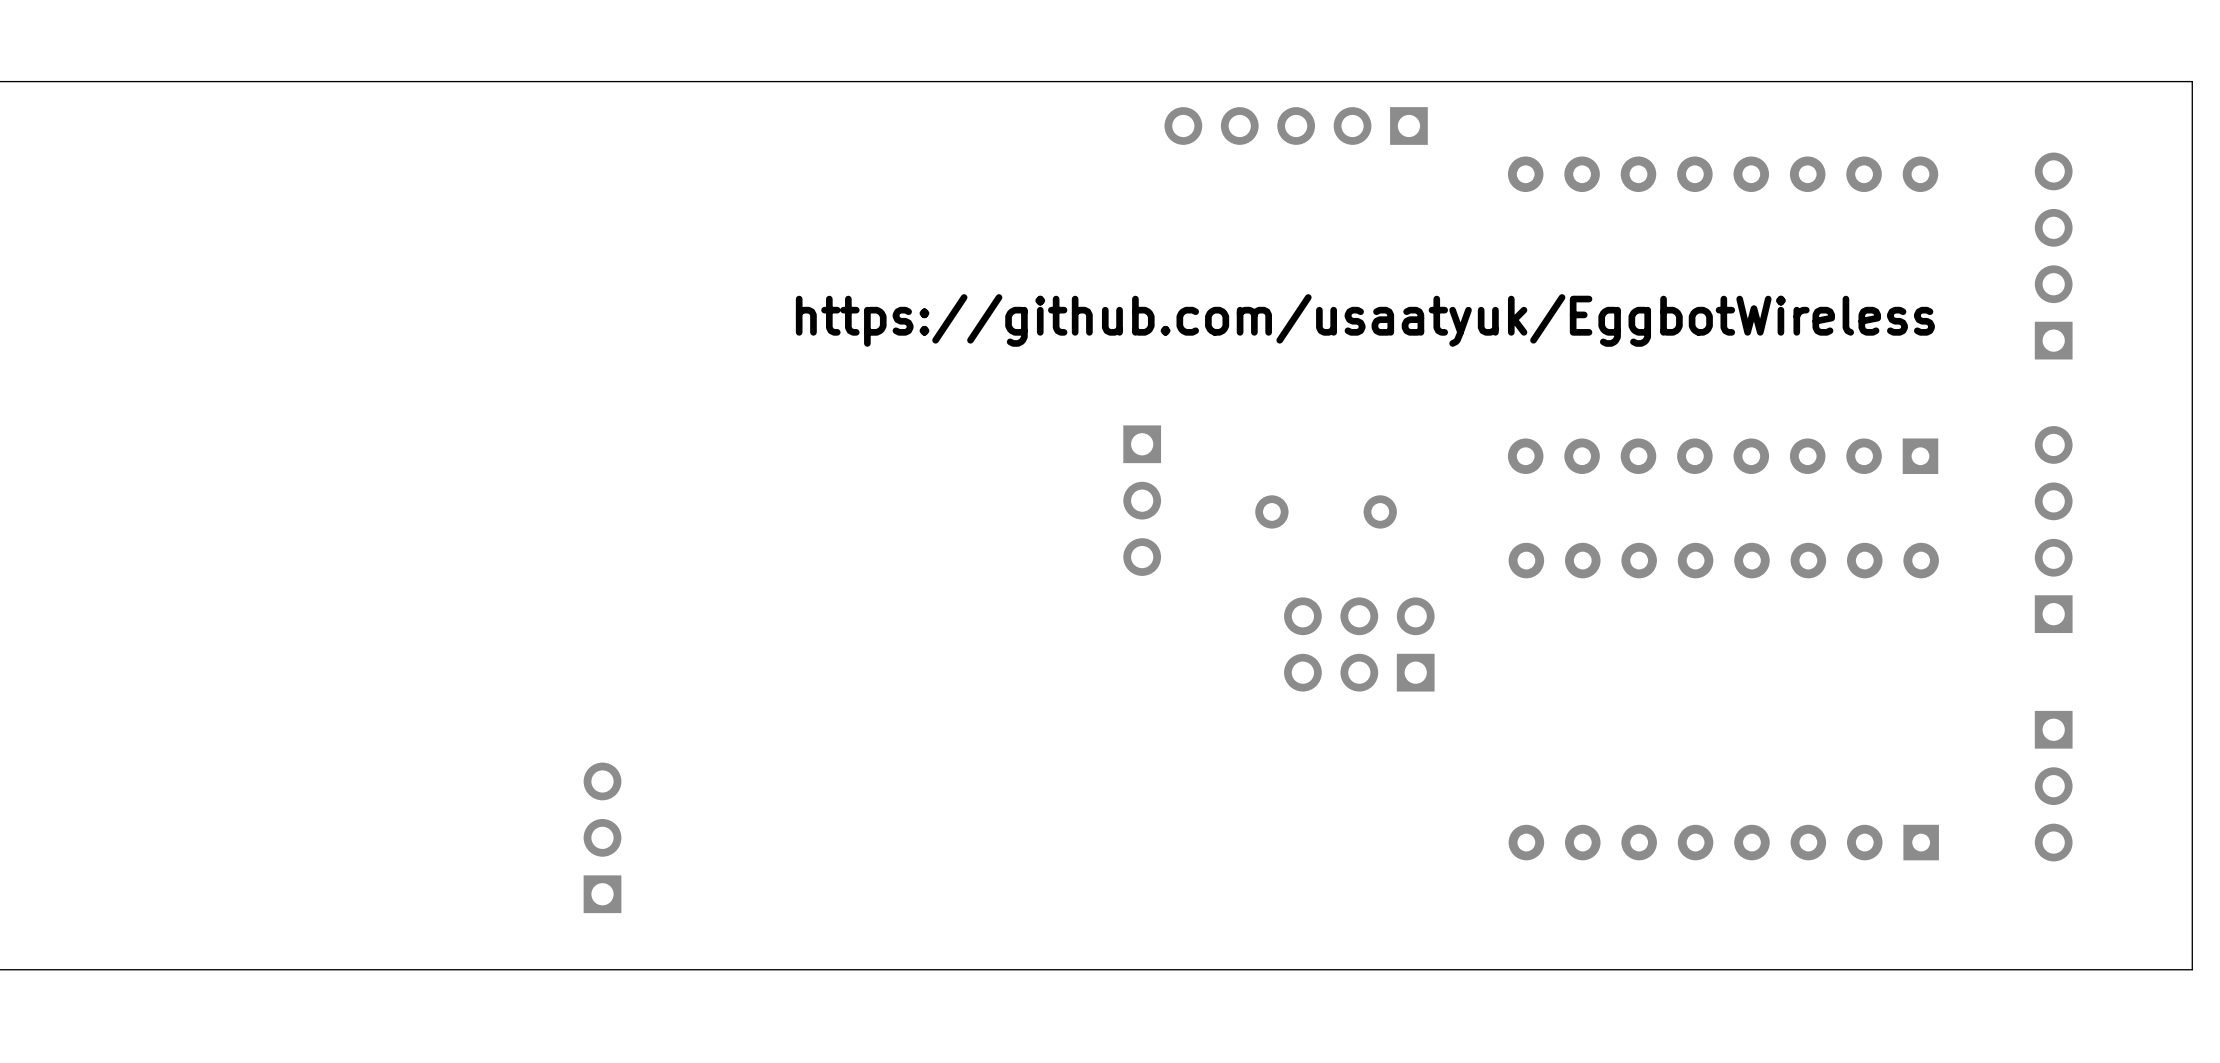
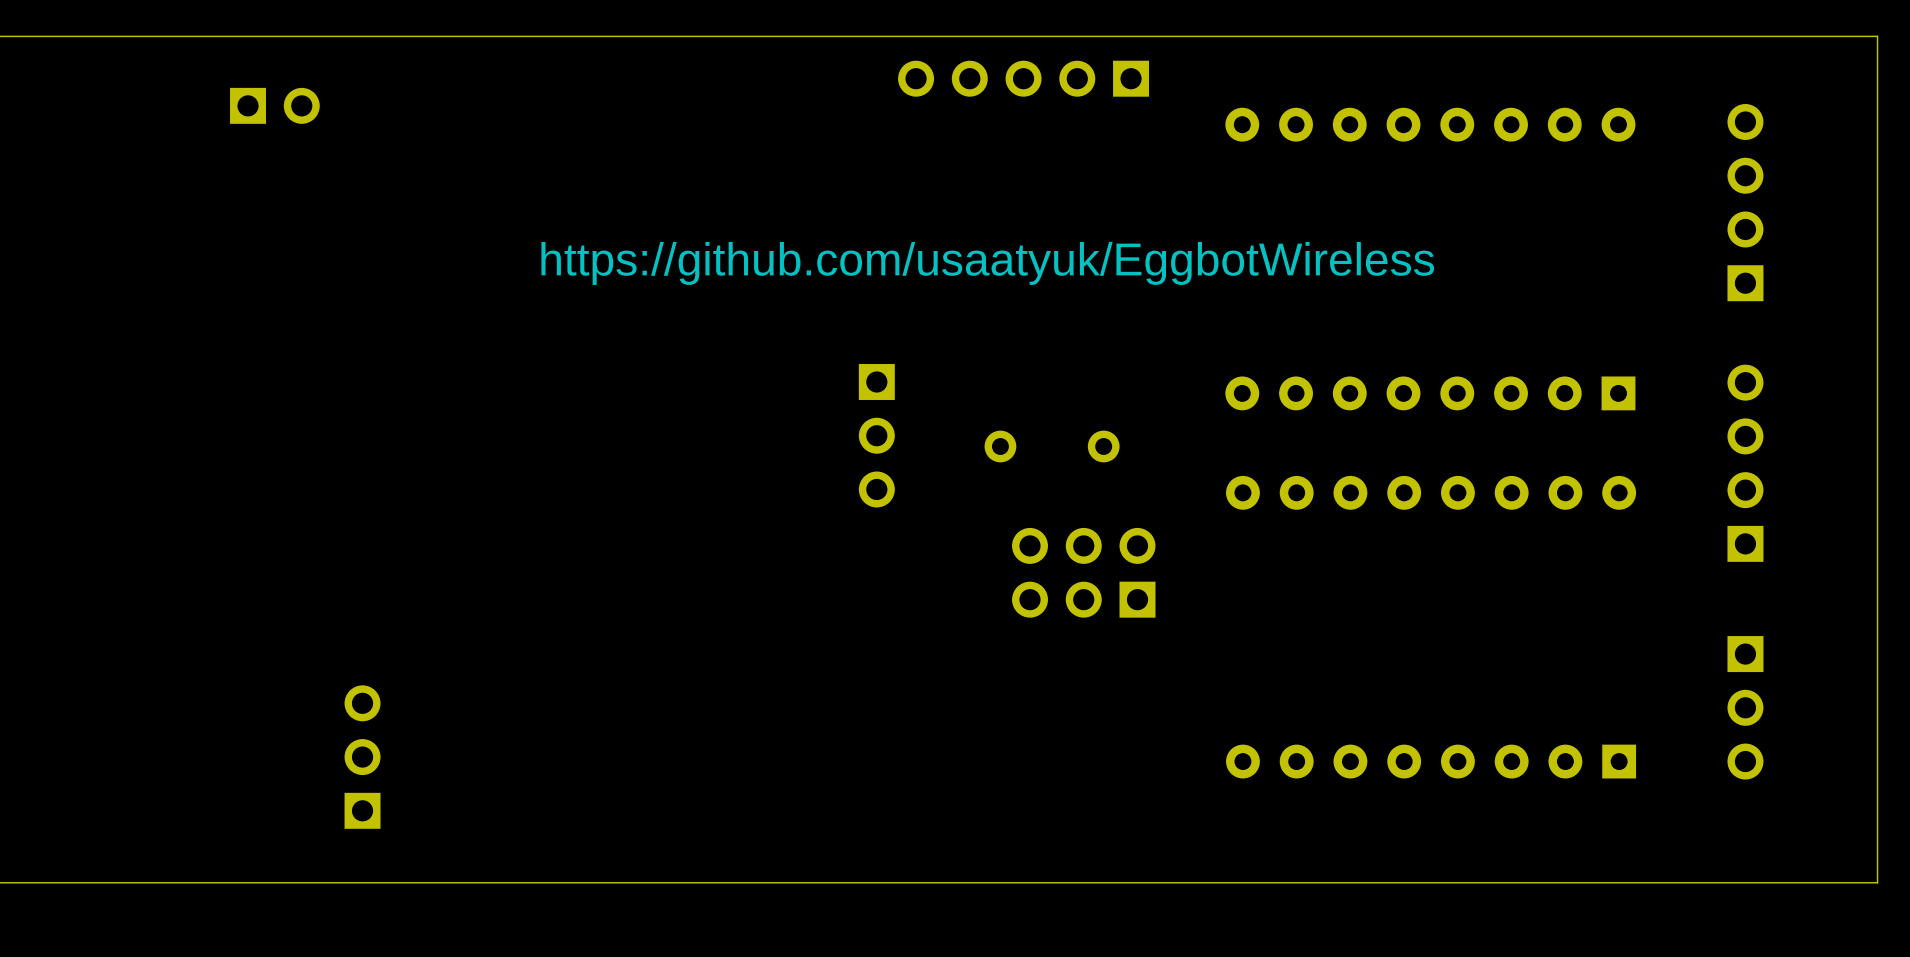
part: none -> (274, 105)

